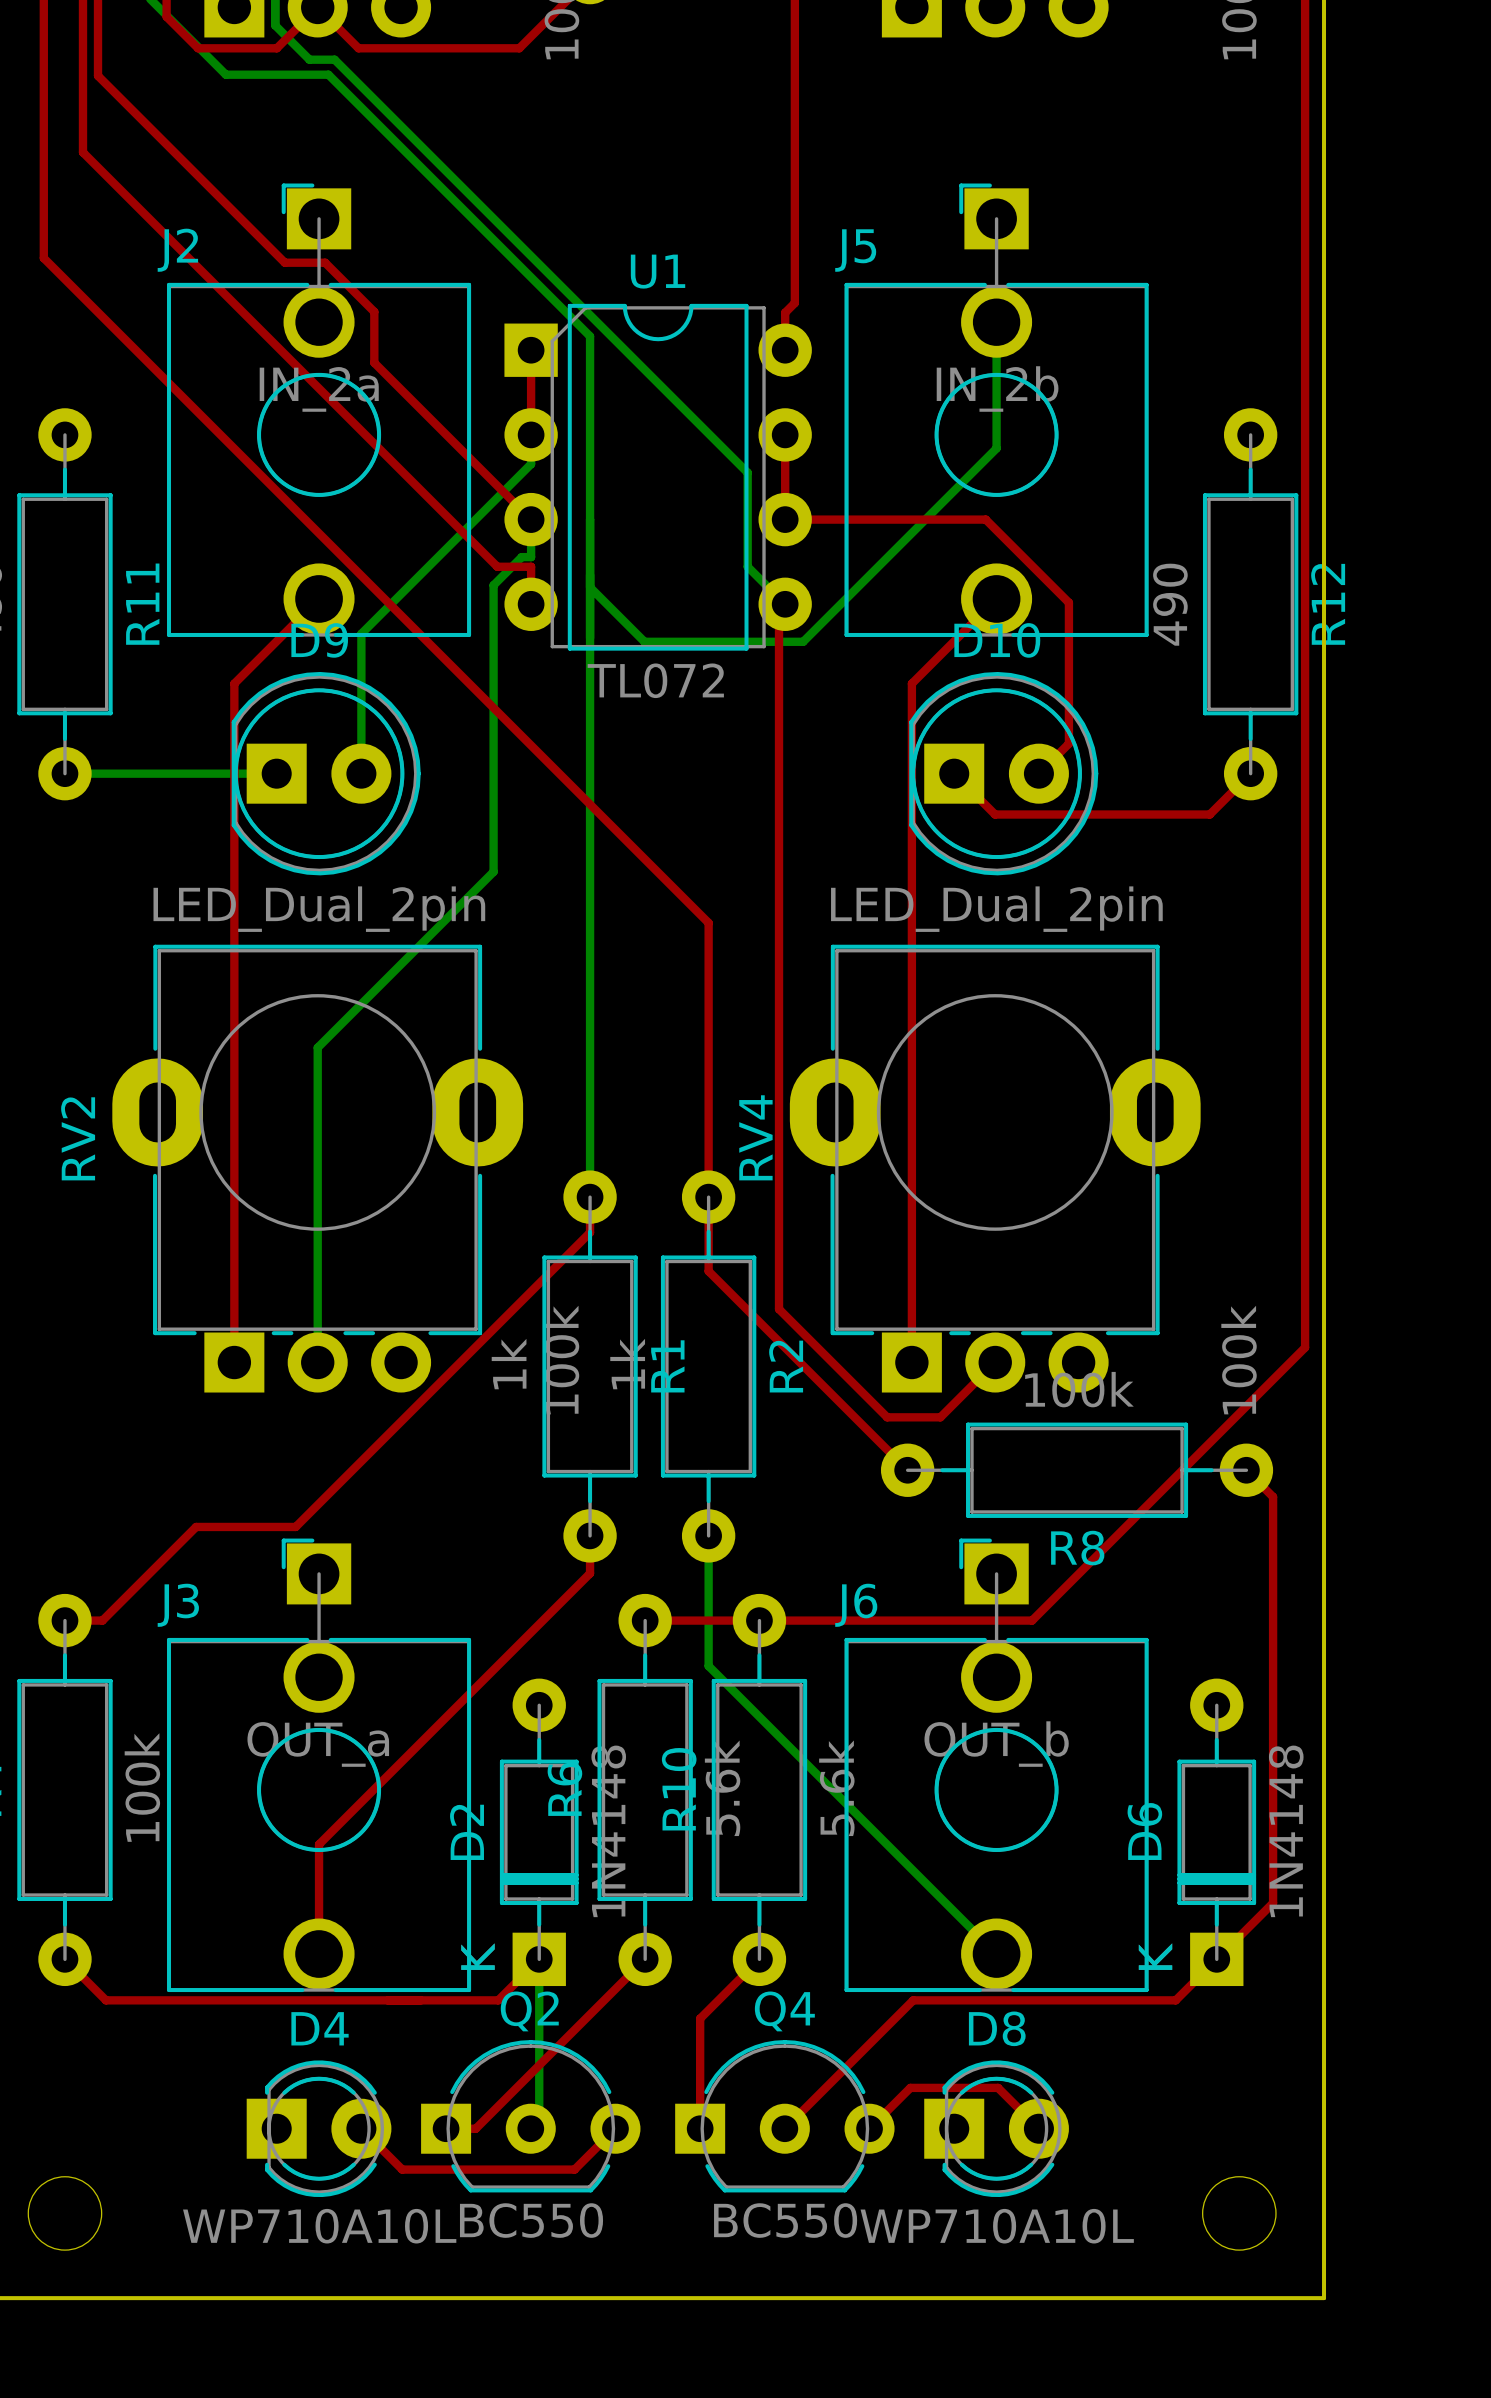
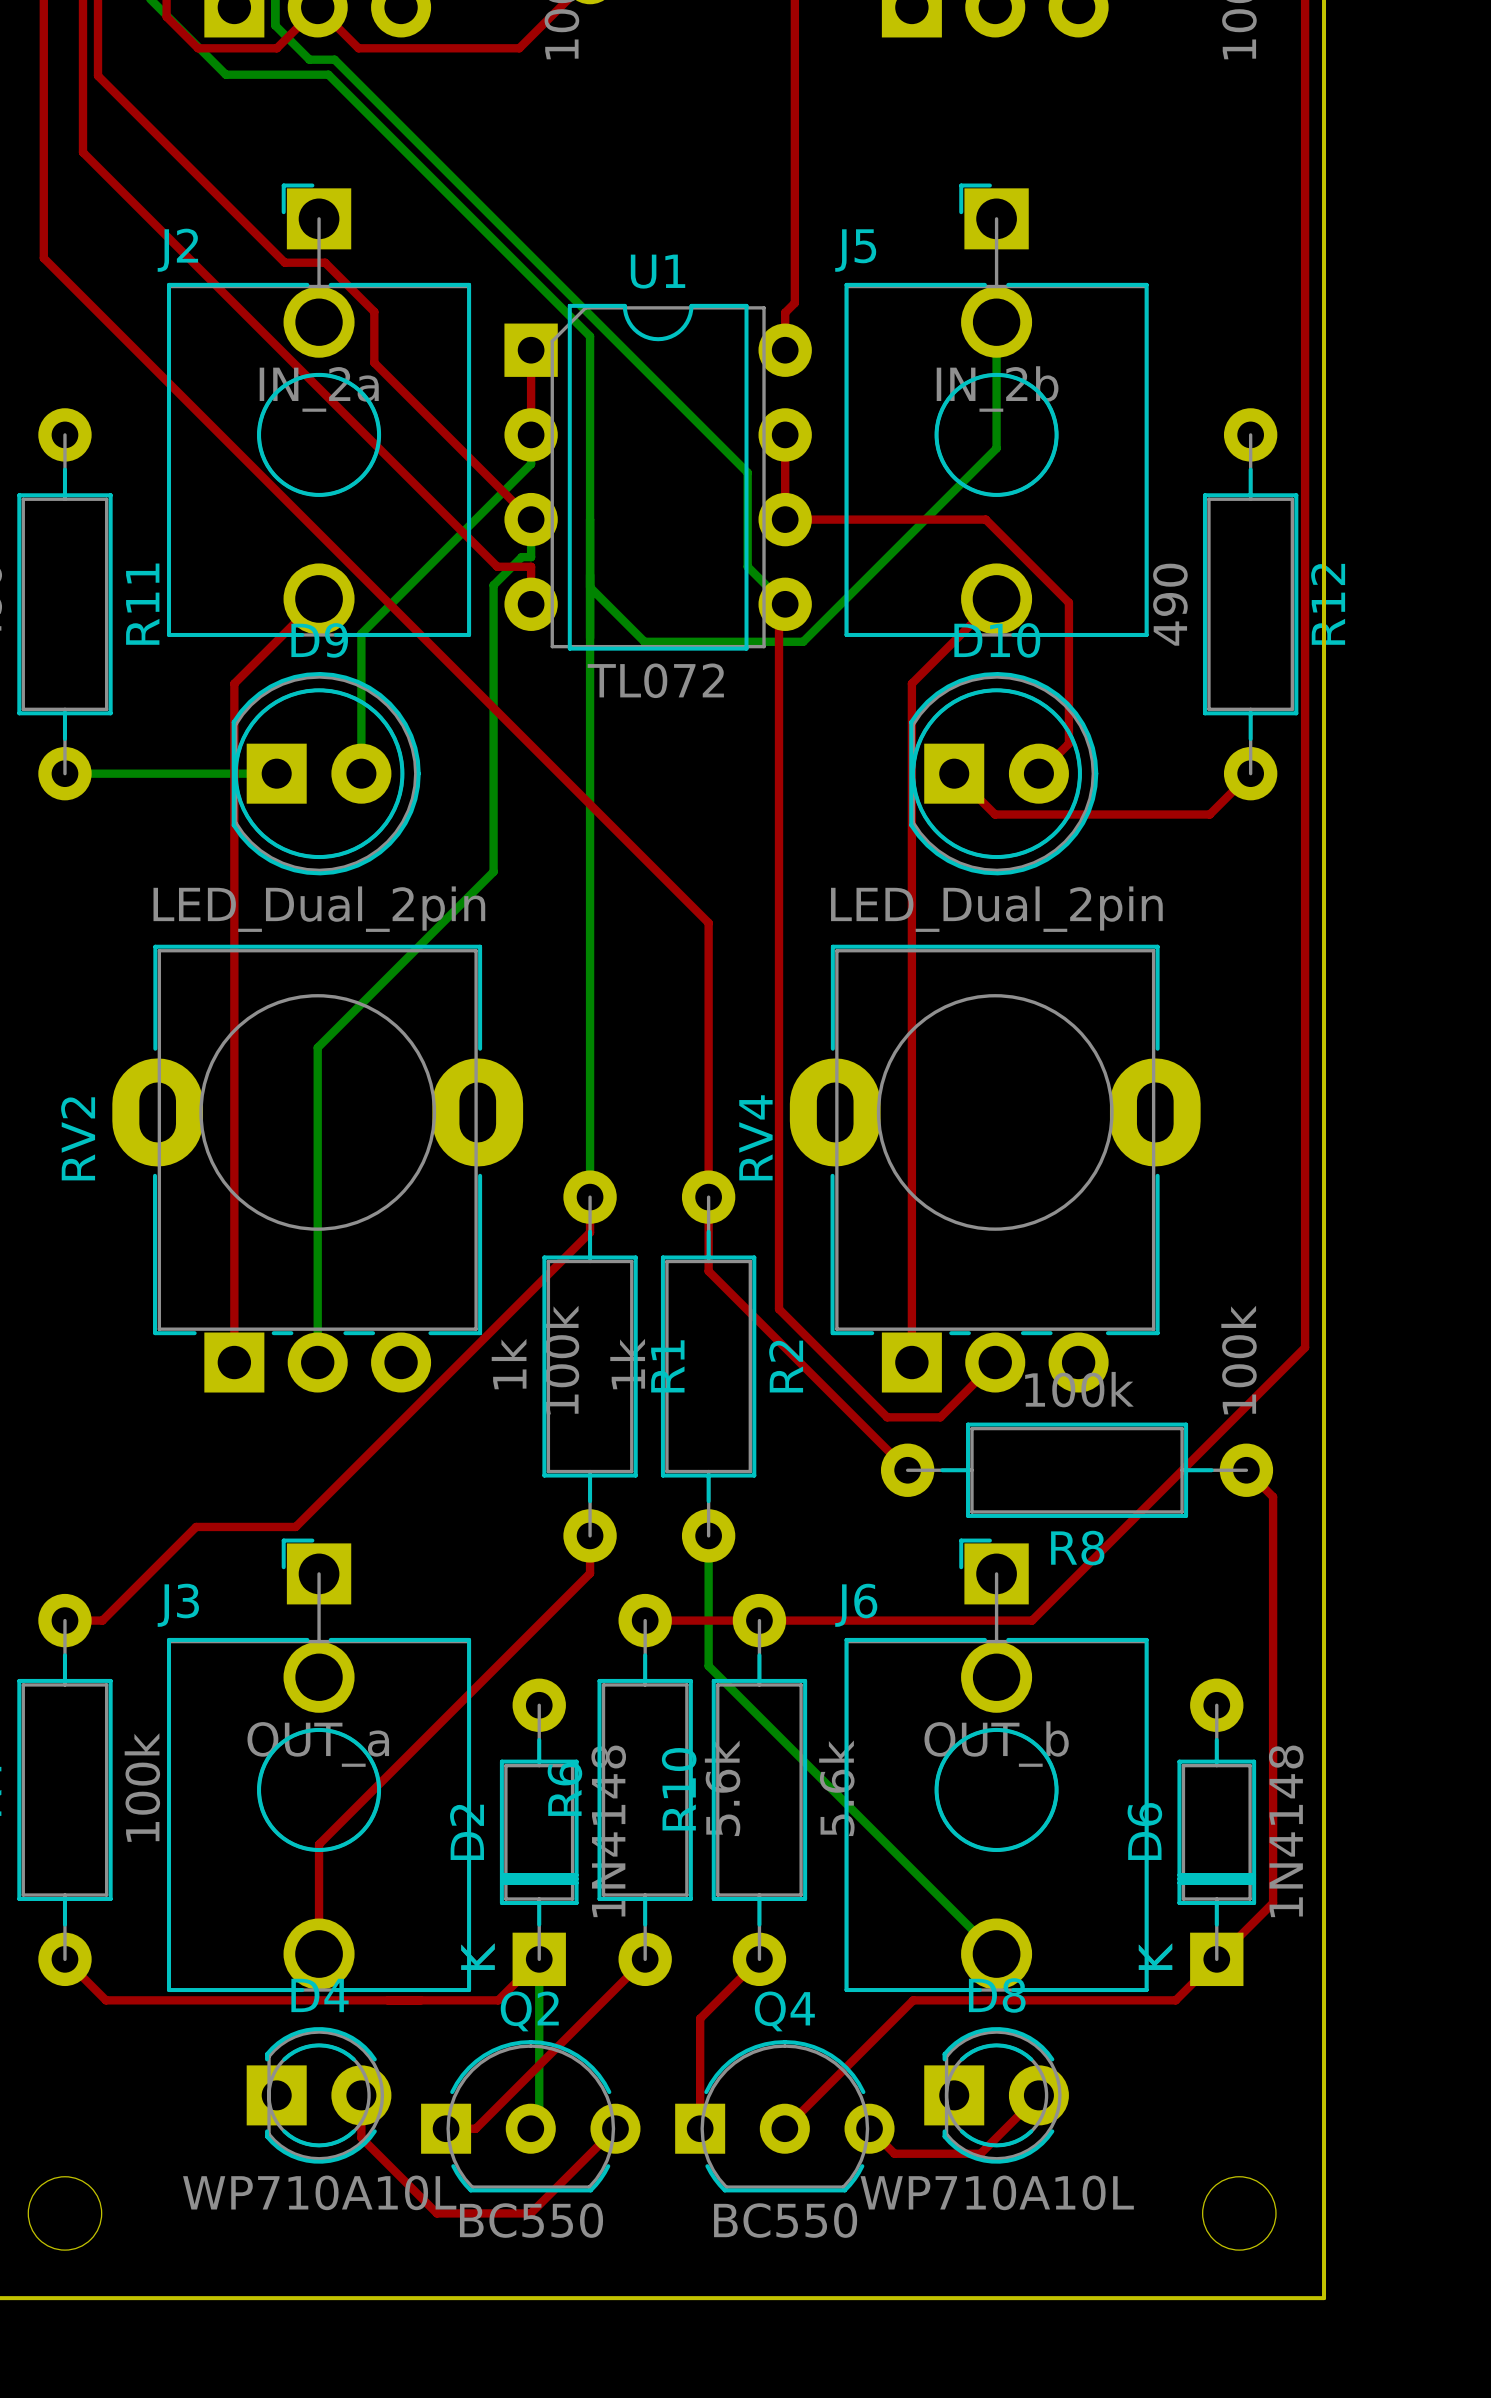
D4 position: (319, 2128) -> (319, 2095)
top track: (361, 2128) (402, 2169) (574, 2169) -> (361, 2095) (361, 2137) (436, 2213) (530, 2213) (574, 2169)
top track: (869, 2128) (910, 2087) (998, 2087) (1038, 2128) -> (869, 2128) (894, 2153) (980, 2153) (1038, 2095)
D8 position: (996, 2128) -> (996, 2095)

